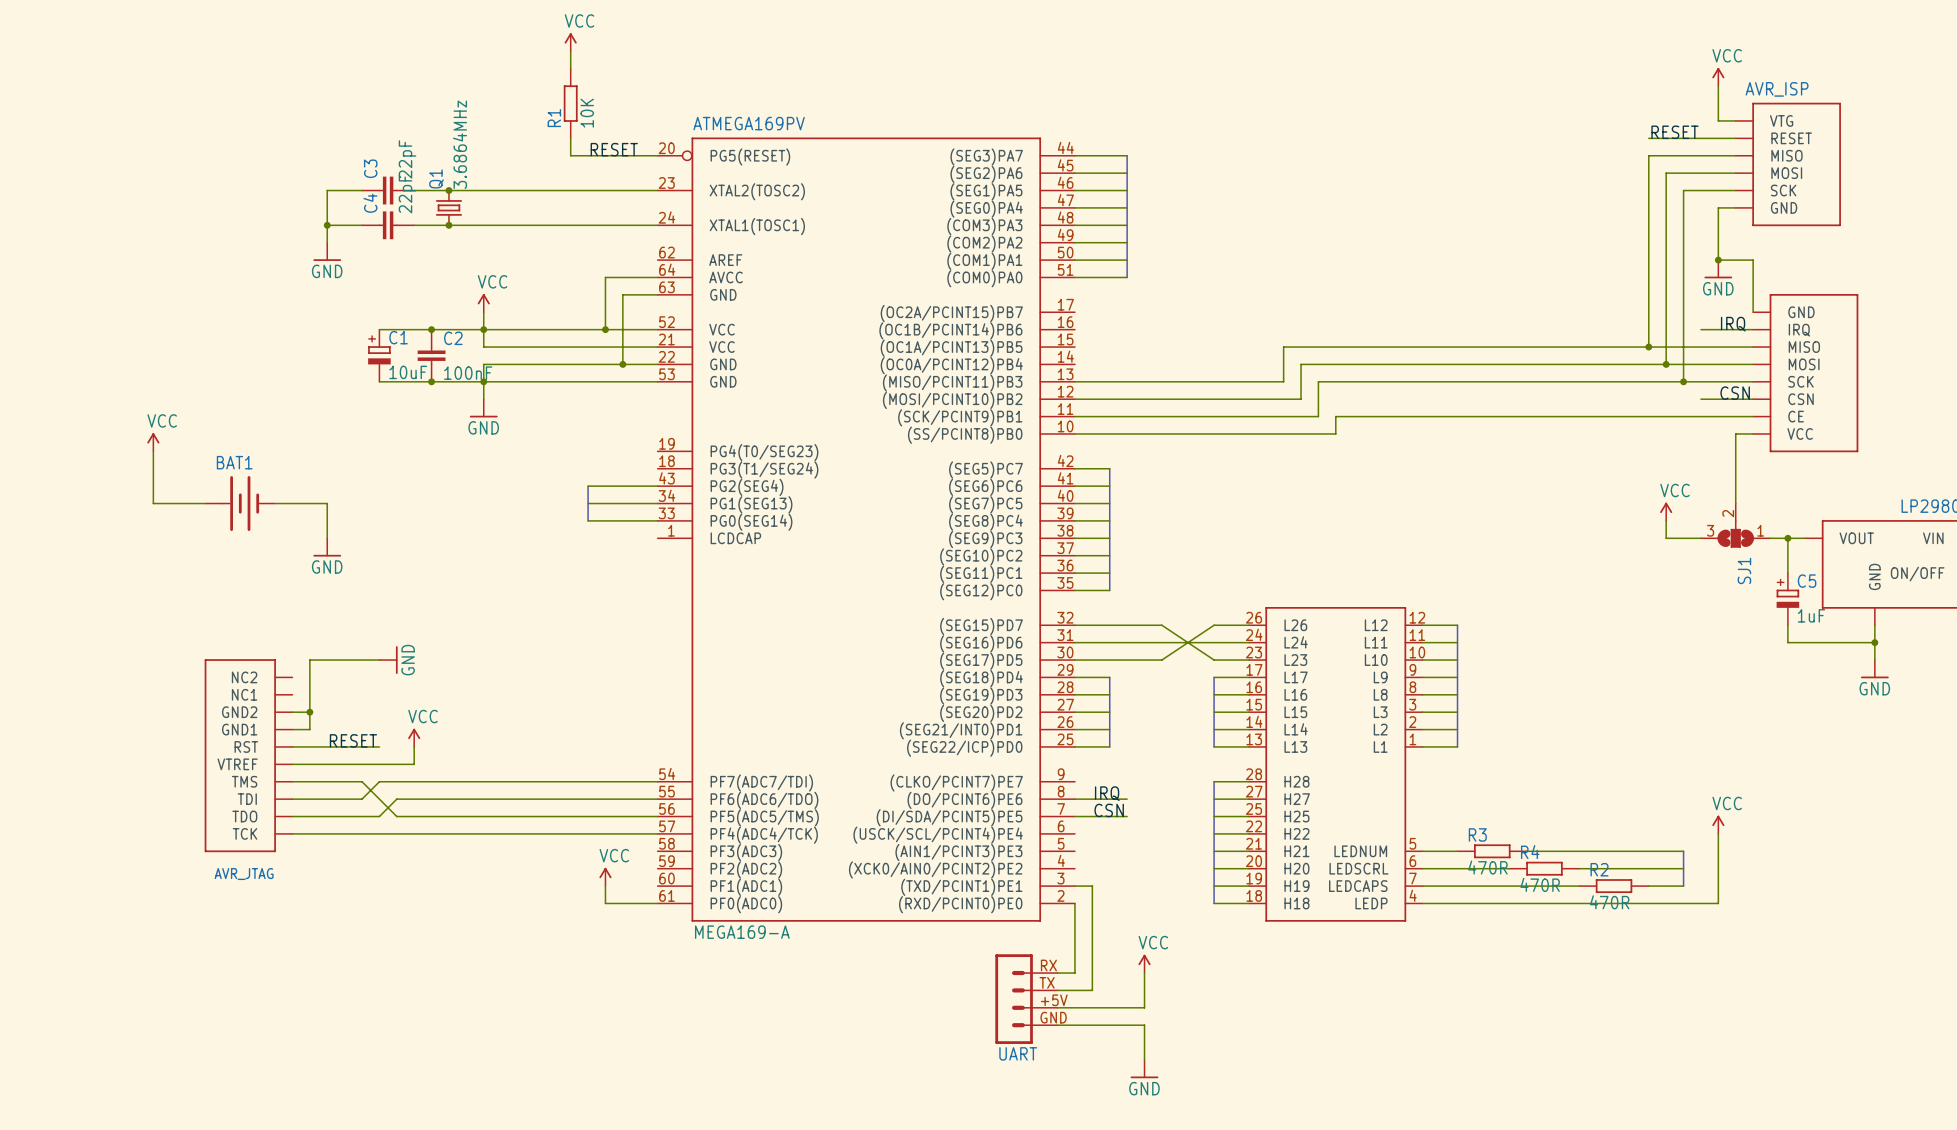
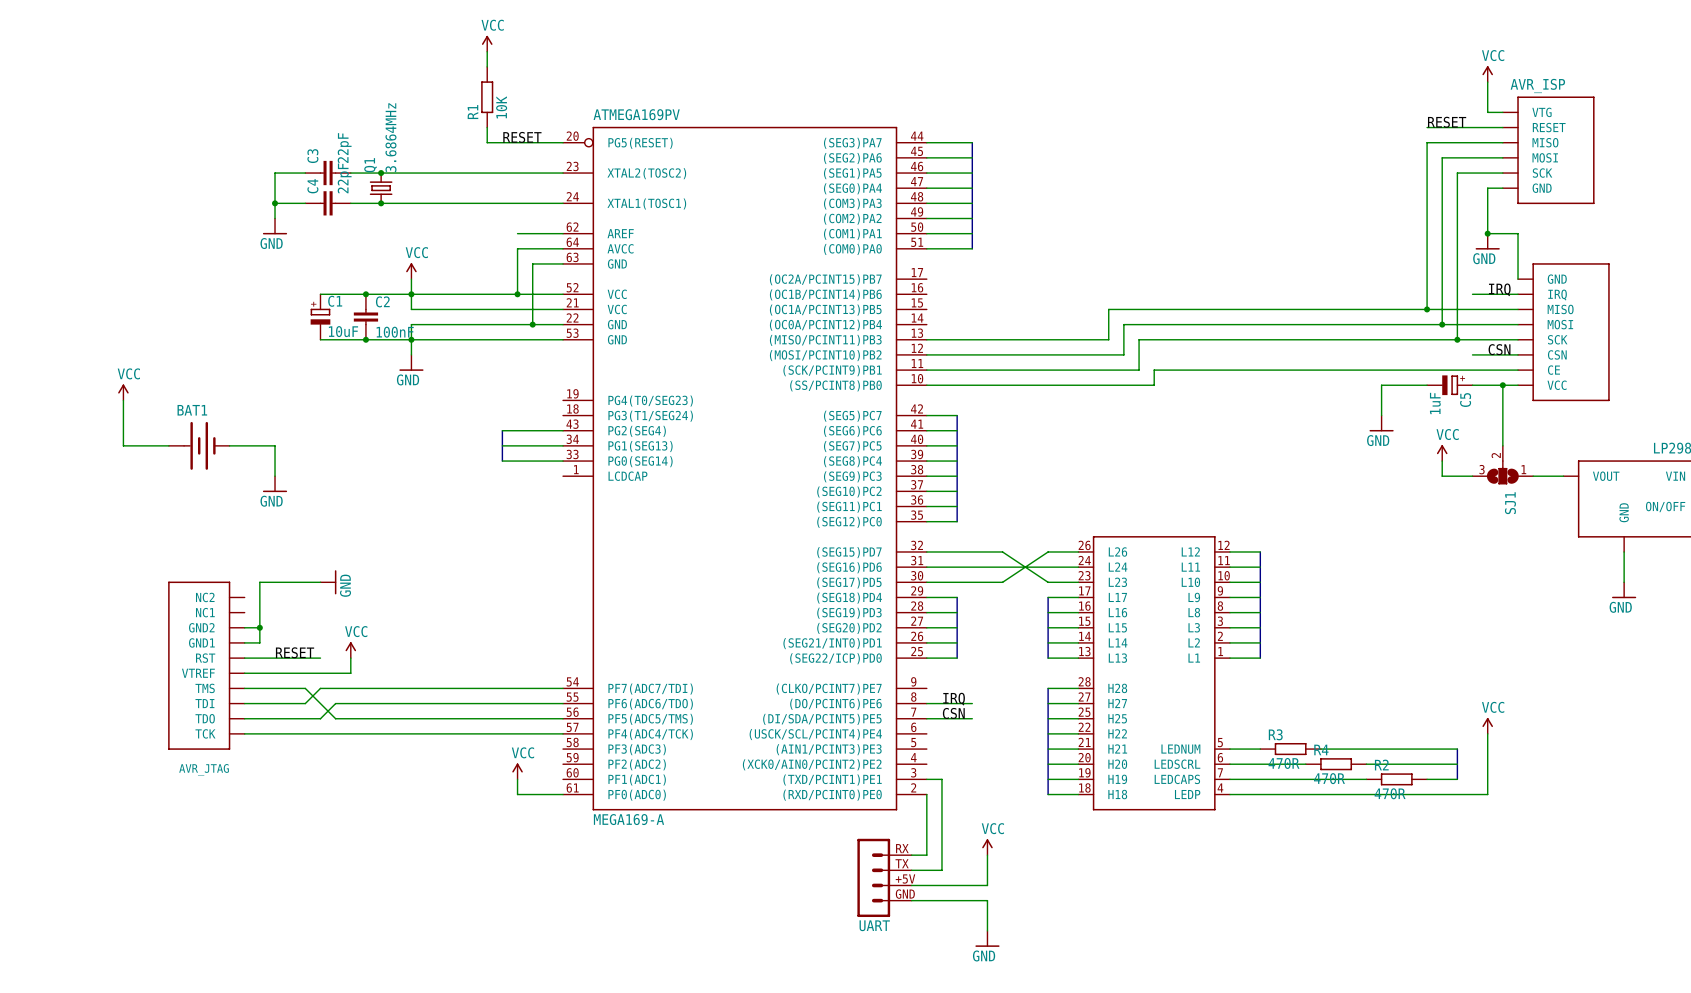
wire: none -> (517, 233) (563, 233)
wire: none -> (1427, 385) (1381, 385) (1381, 415)
wire: none -> (1472, 385) (1502, 385)
junction: none -> (1502, 385)
power symbol: none -> GND (1381, 423)
wire: (1787, 538) (1787, 573) -> none
junction: (1787, 538) -> none
C5 rotation: 0° (1787, 598) -> 90° clockwise (1450, 385)
C5 position: (1787, 599) -> (1449, 385)
wire: (1787, 625) (1787, 642) (1874, 642) -> none
junction: (1874, 642) -> none

